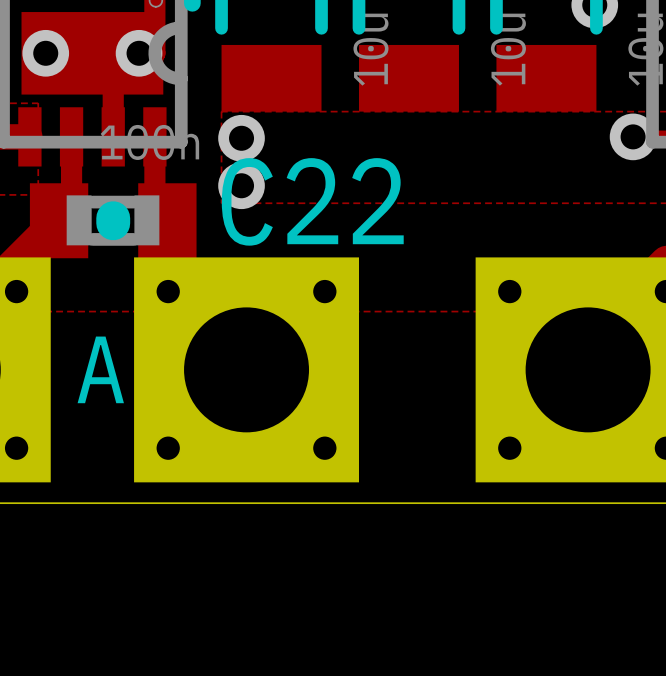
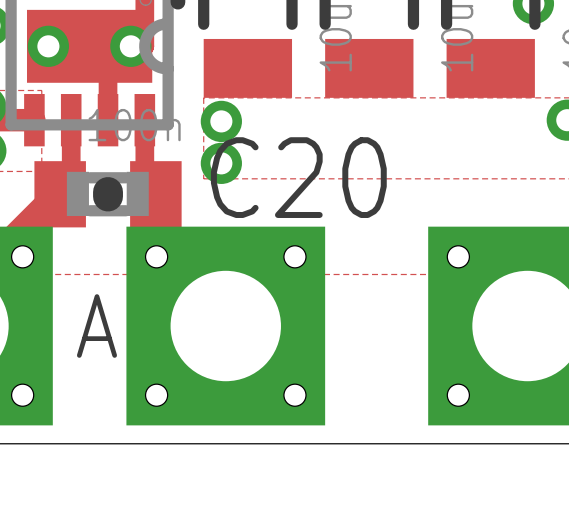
C22 name: C22 (312, 201) -> C20 (298, 177)

